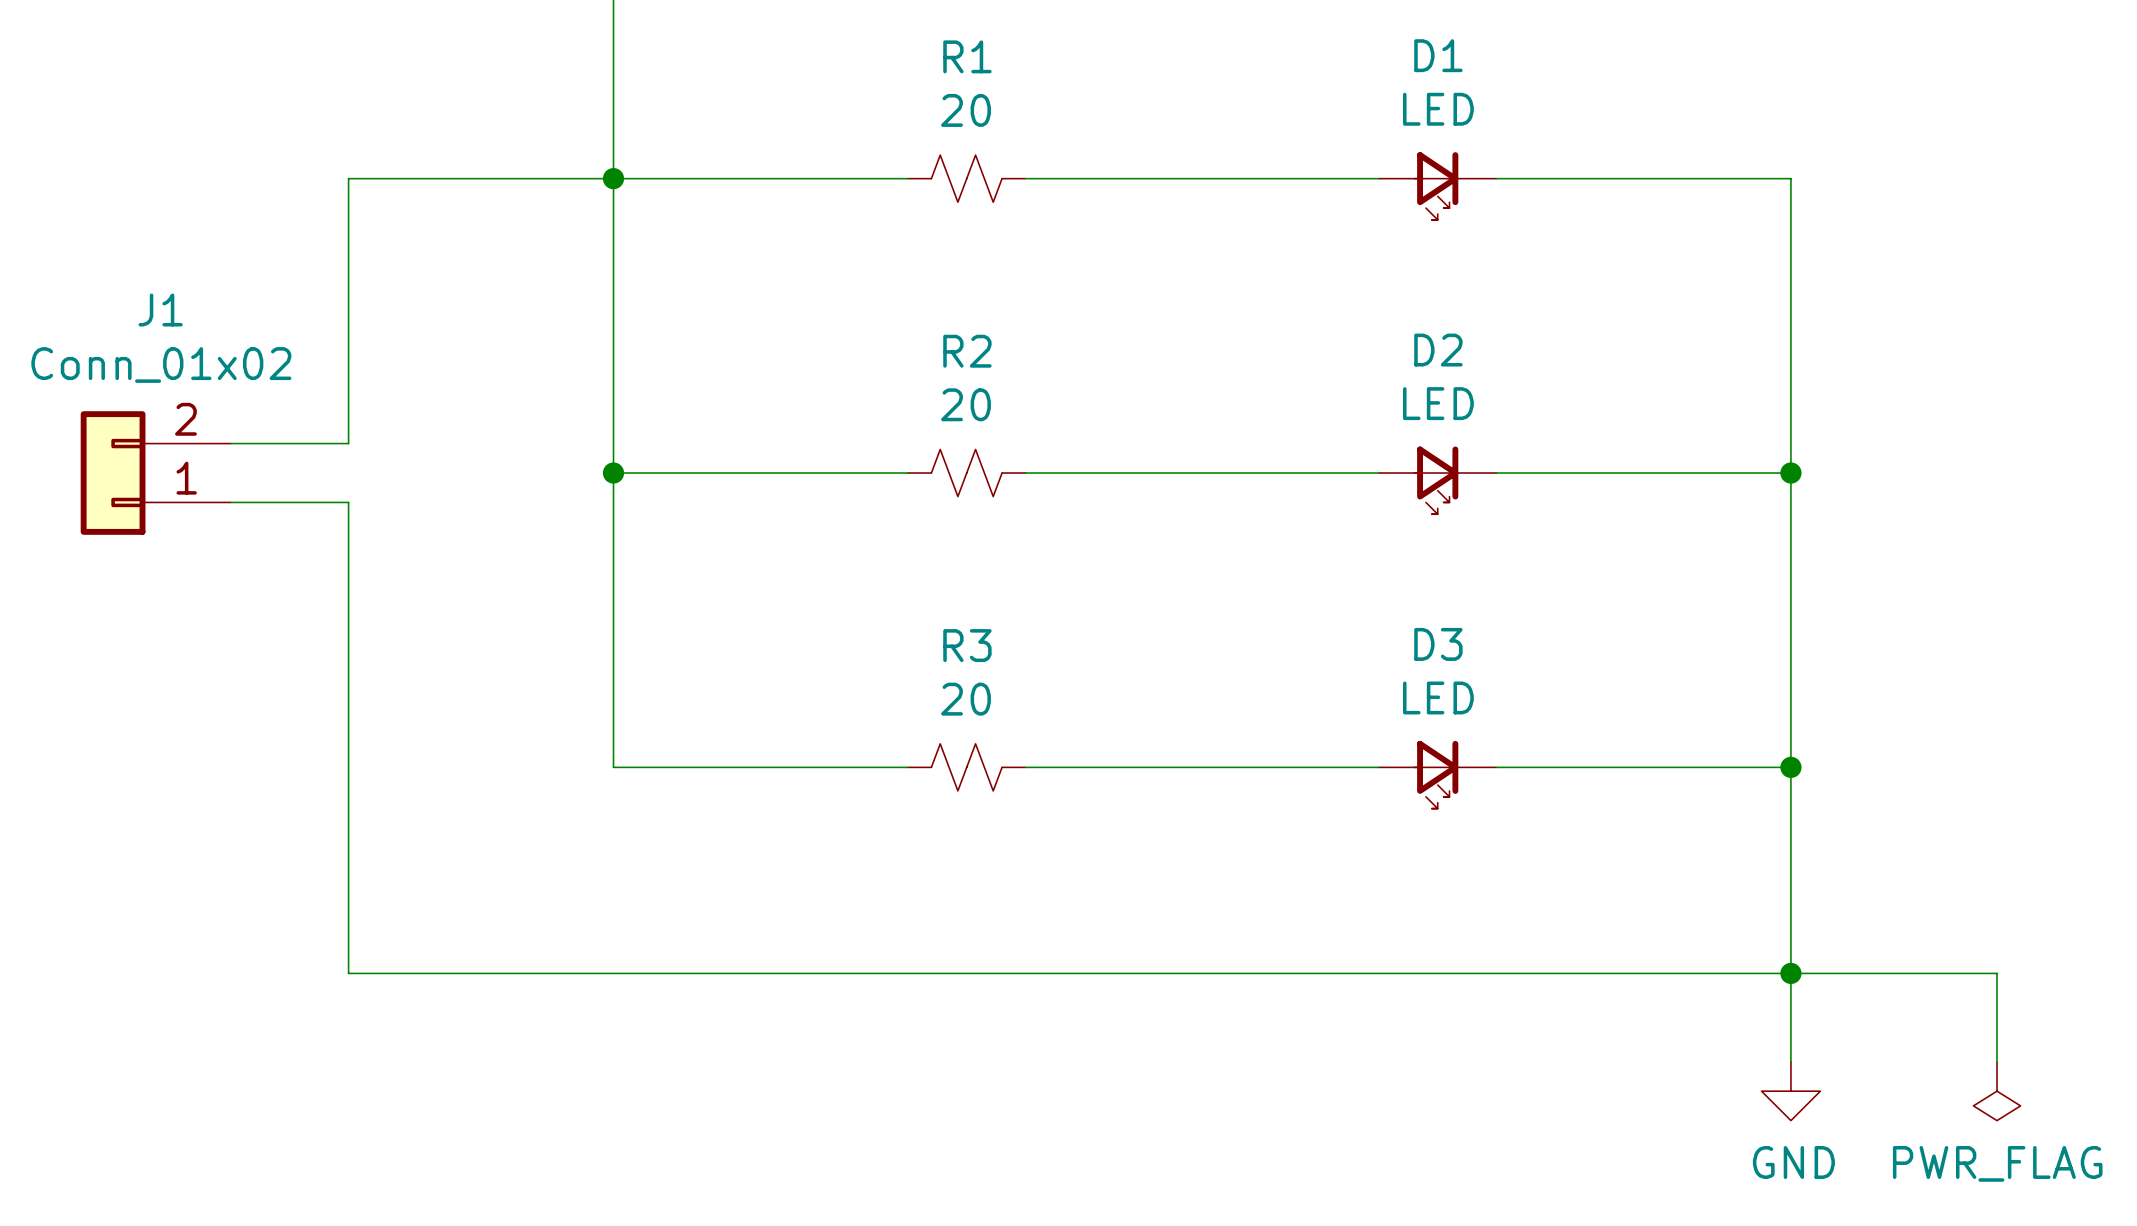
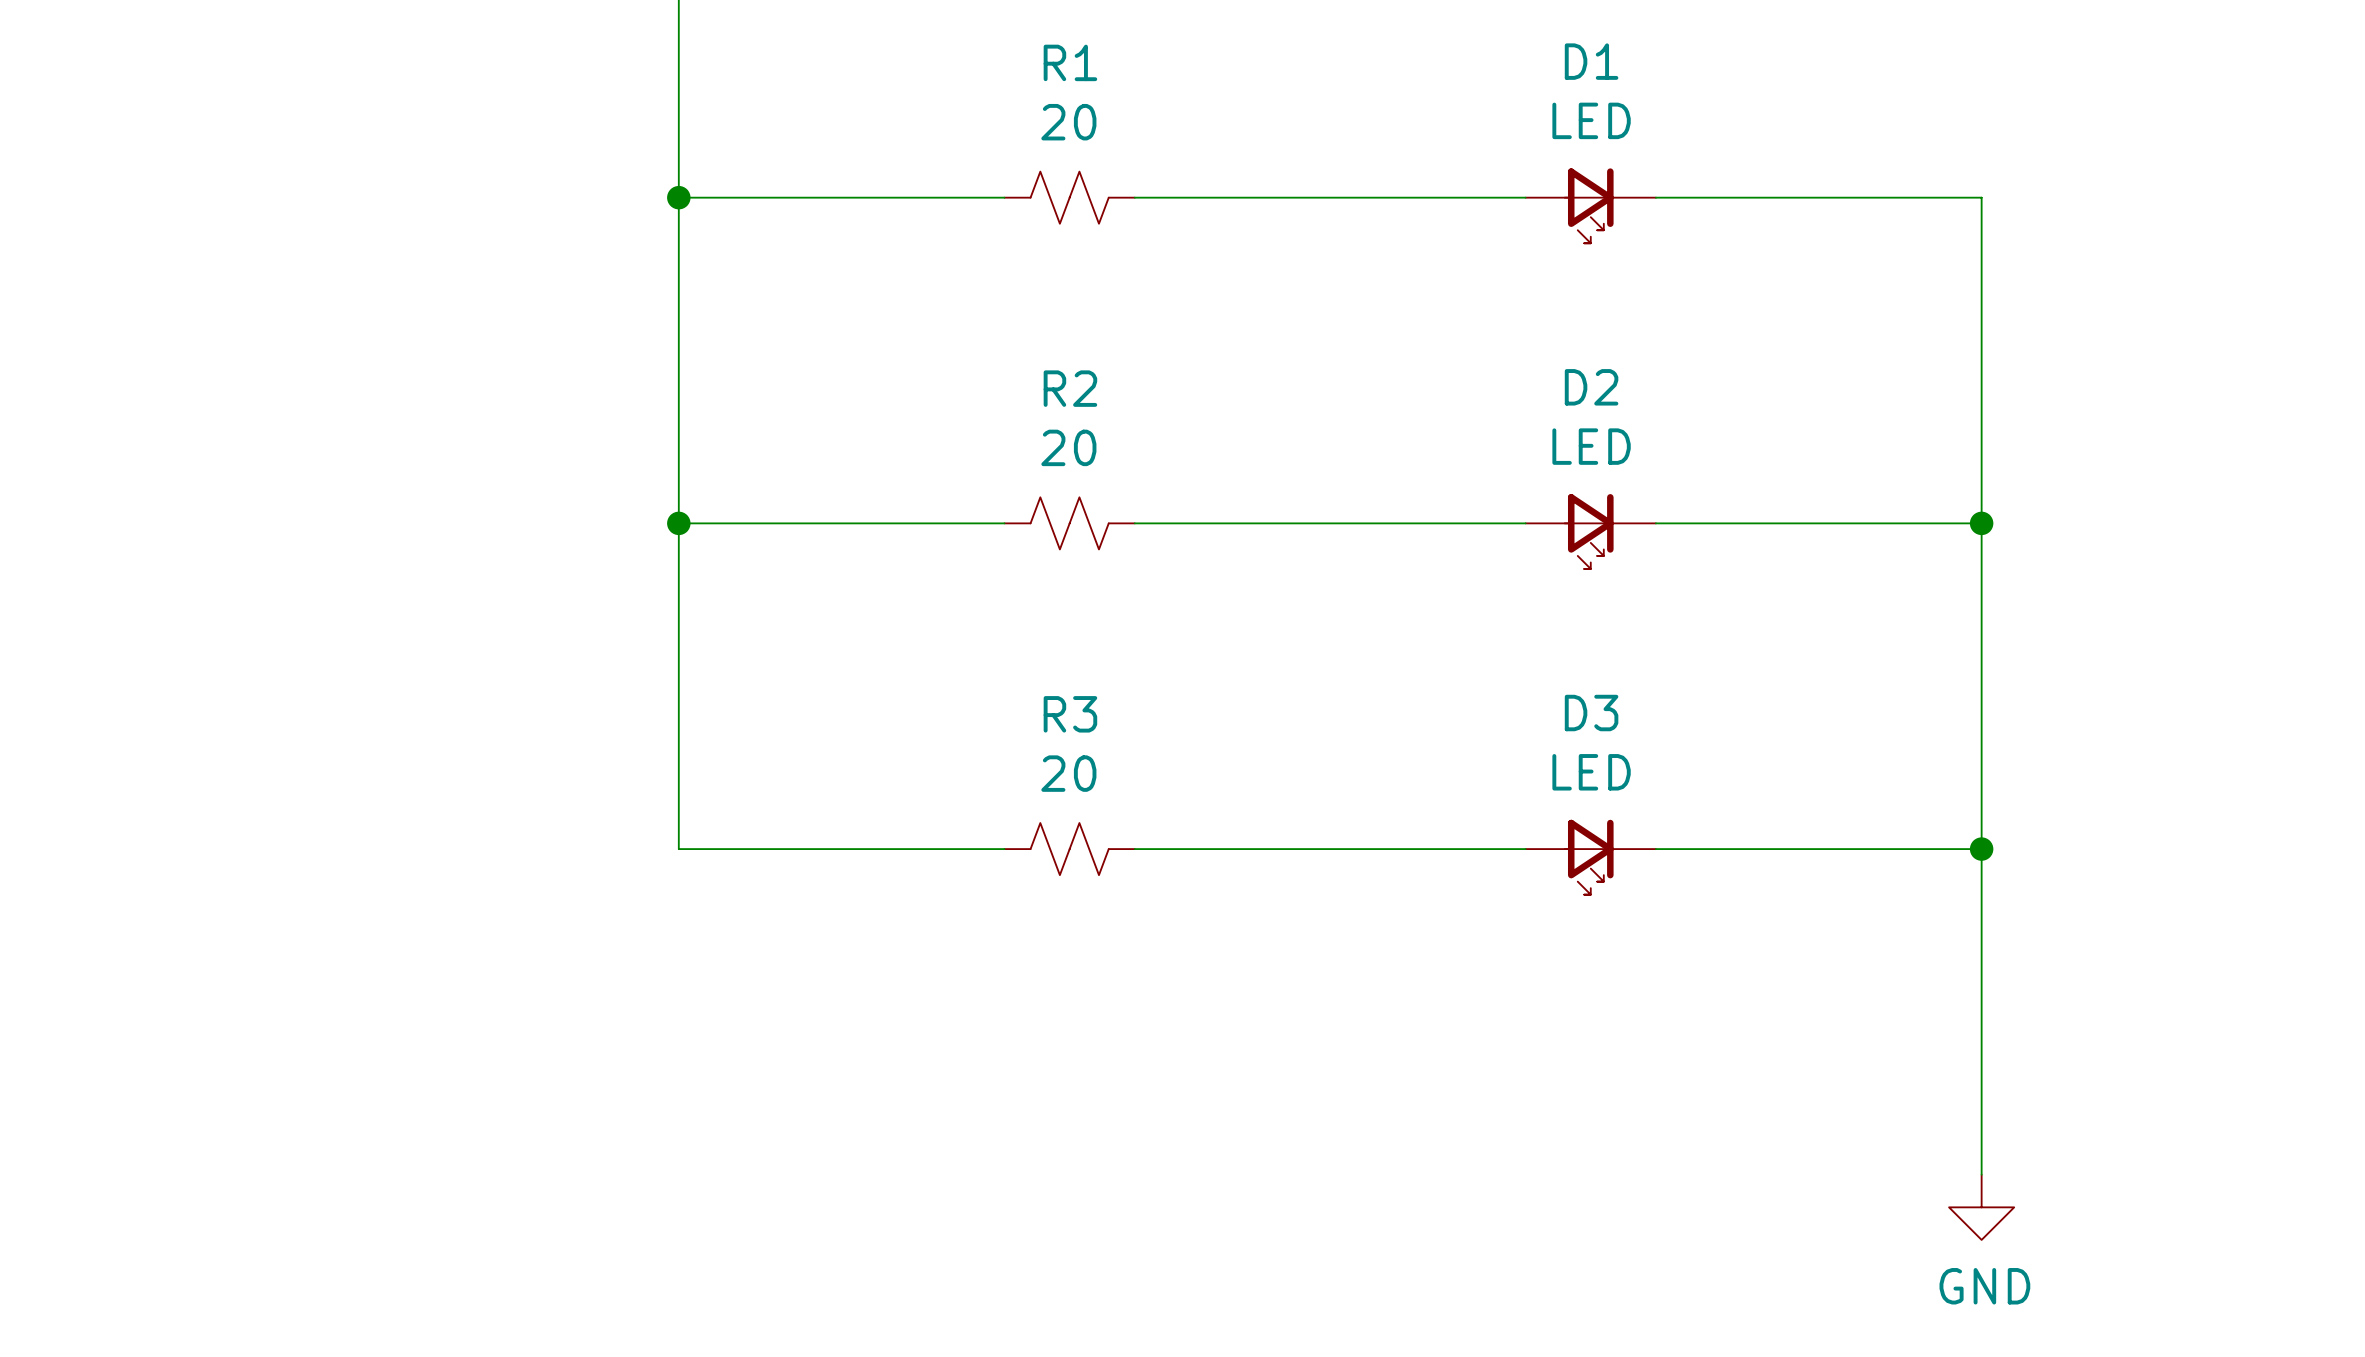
wire: (613, 178) (348, 178) (348, 443) (230, 443) -> none
J1: Conn_01x02 (155, 473) -> none
wire: (230, 502) (348, 502) (348, 973) (1997, 973) (1997, 1061) -> none
junction: (1790, 973) -> none
power symbol: PWR_FLAG (1997, 1091) -> none

